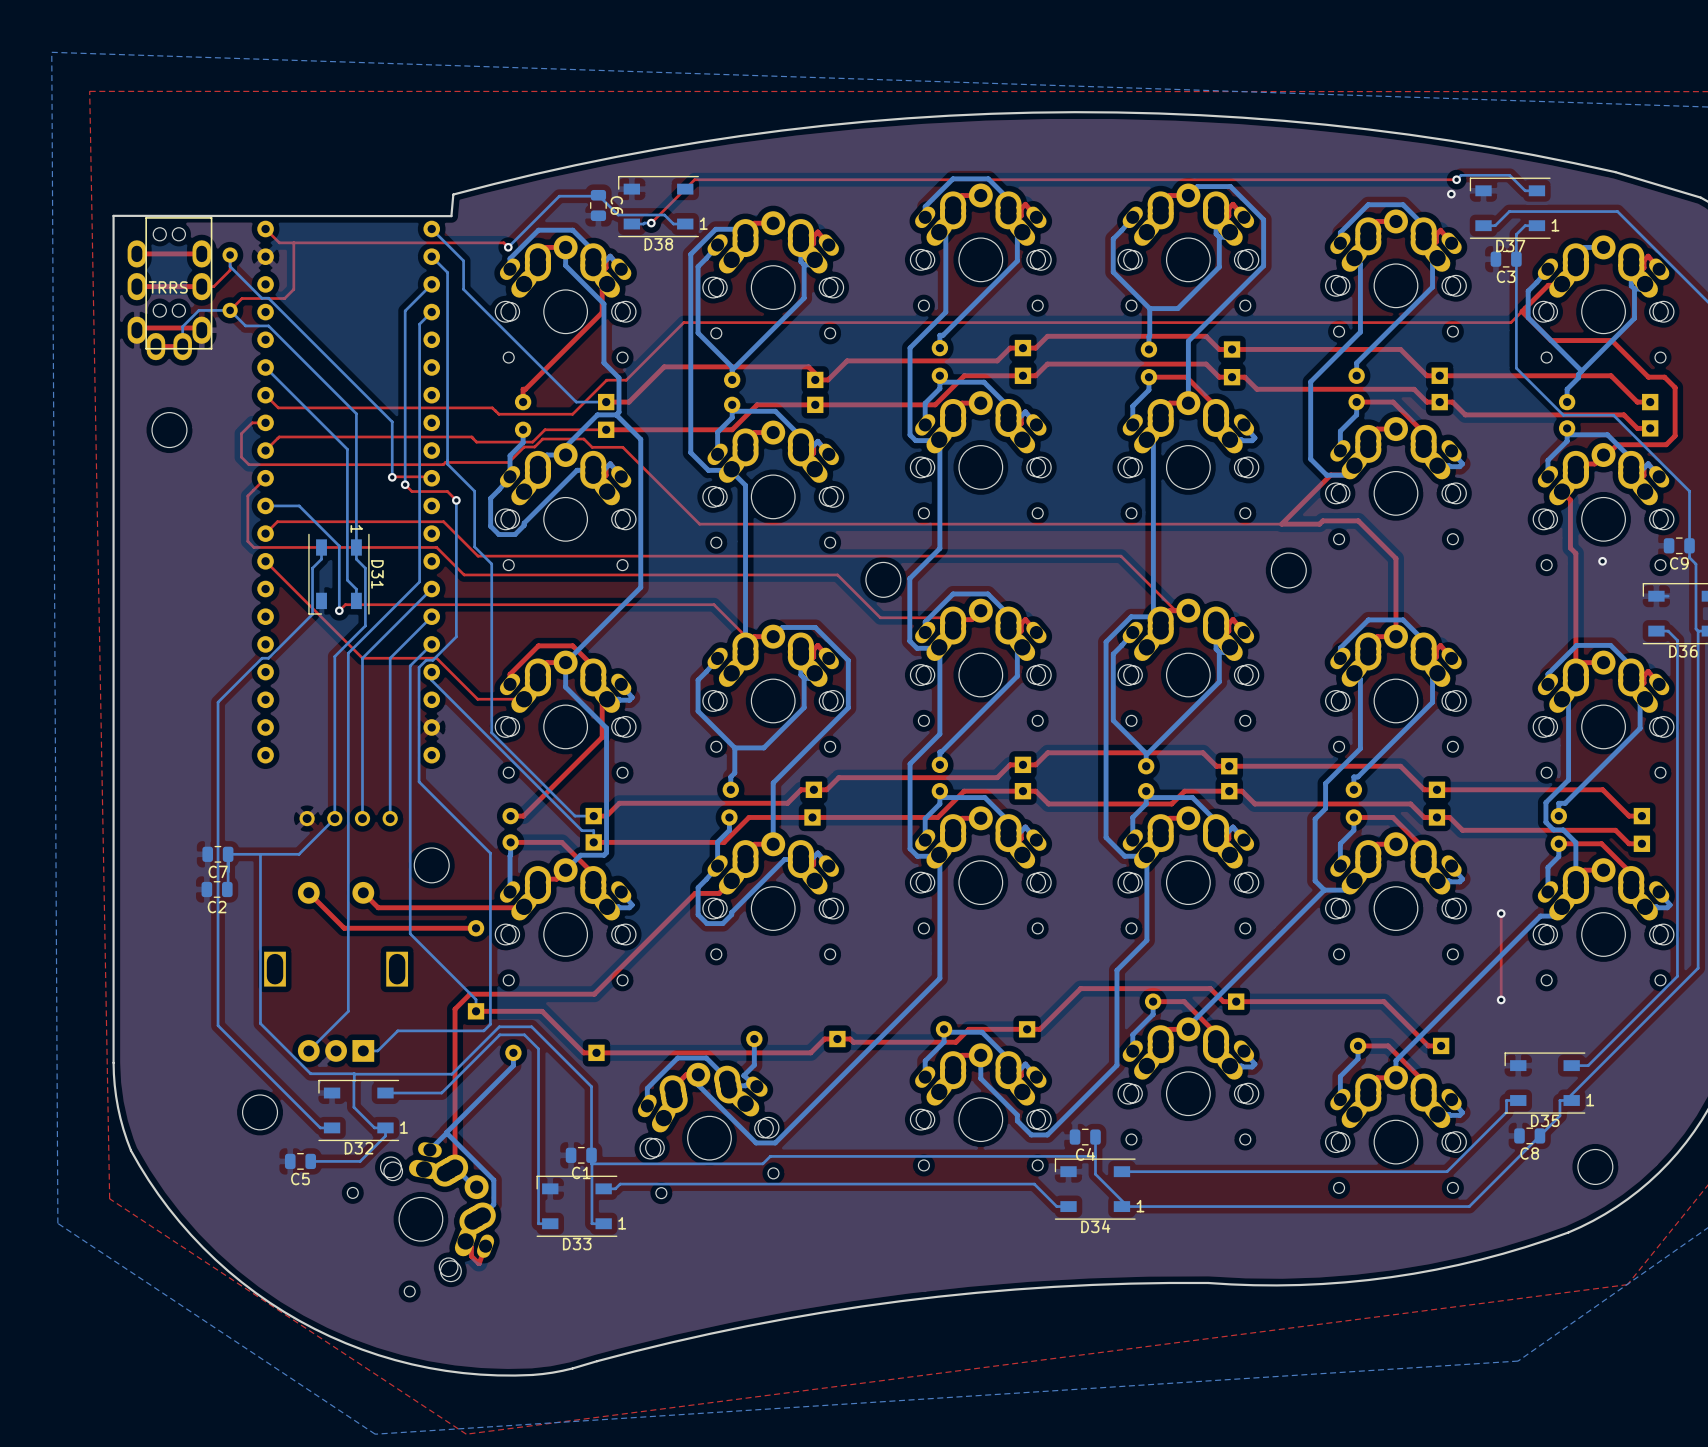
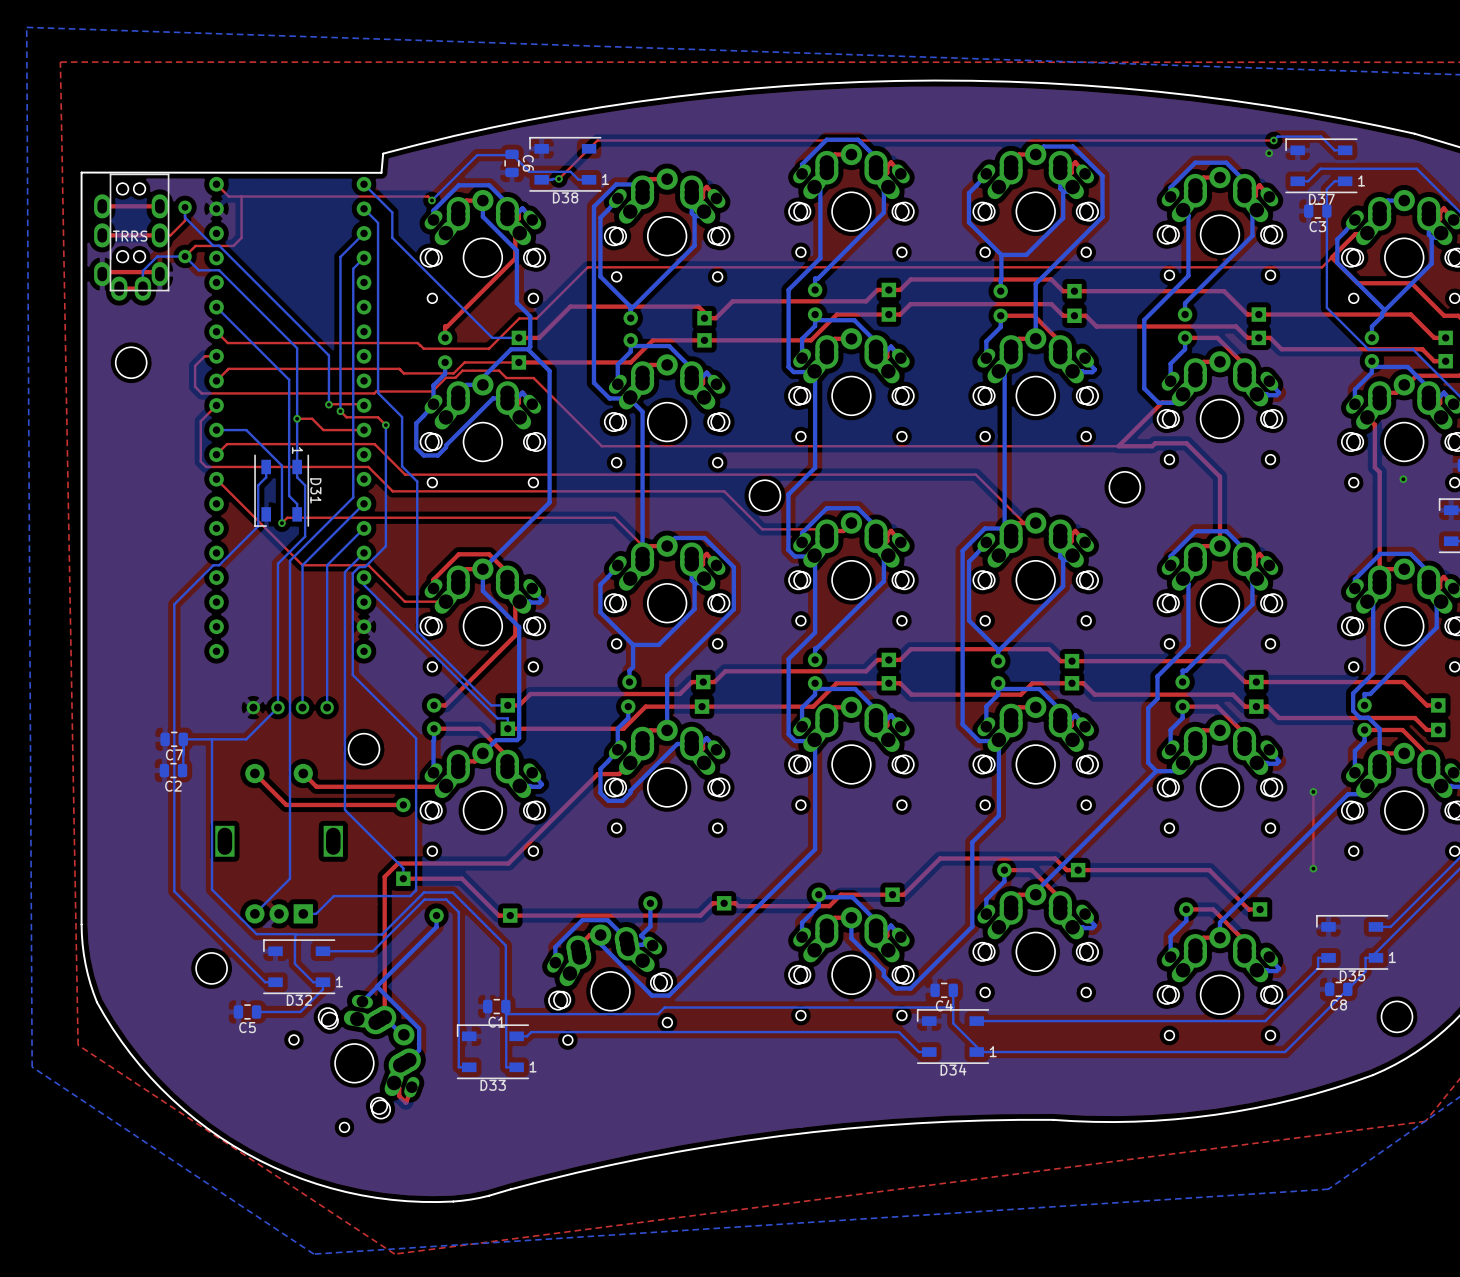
top track: none -> (297, 418) (312, 418) (323, 430) (364, 430)
via: none -> (297, 418)

